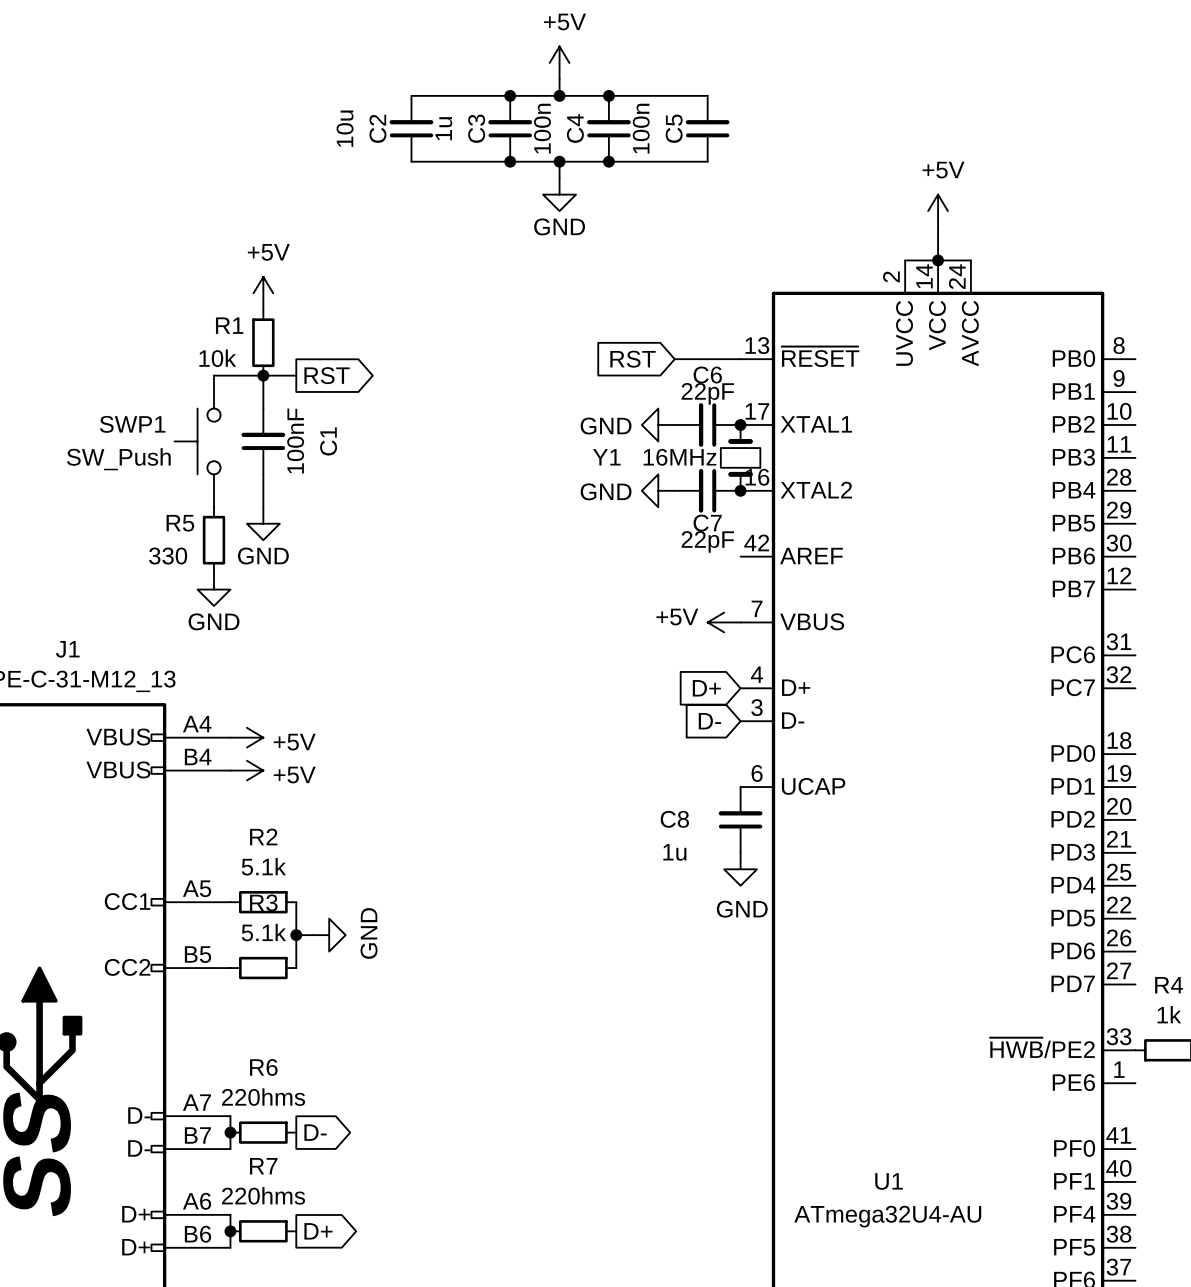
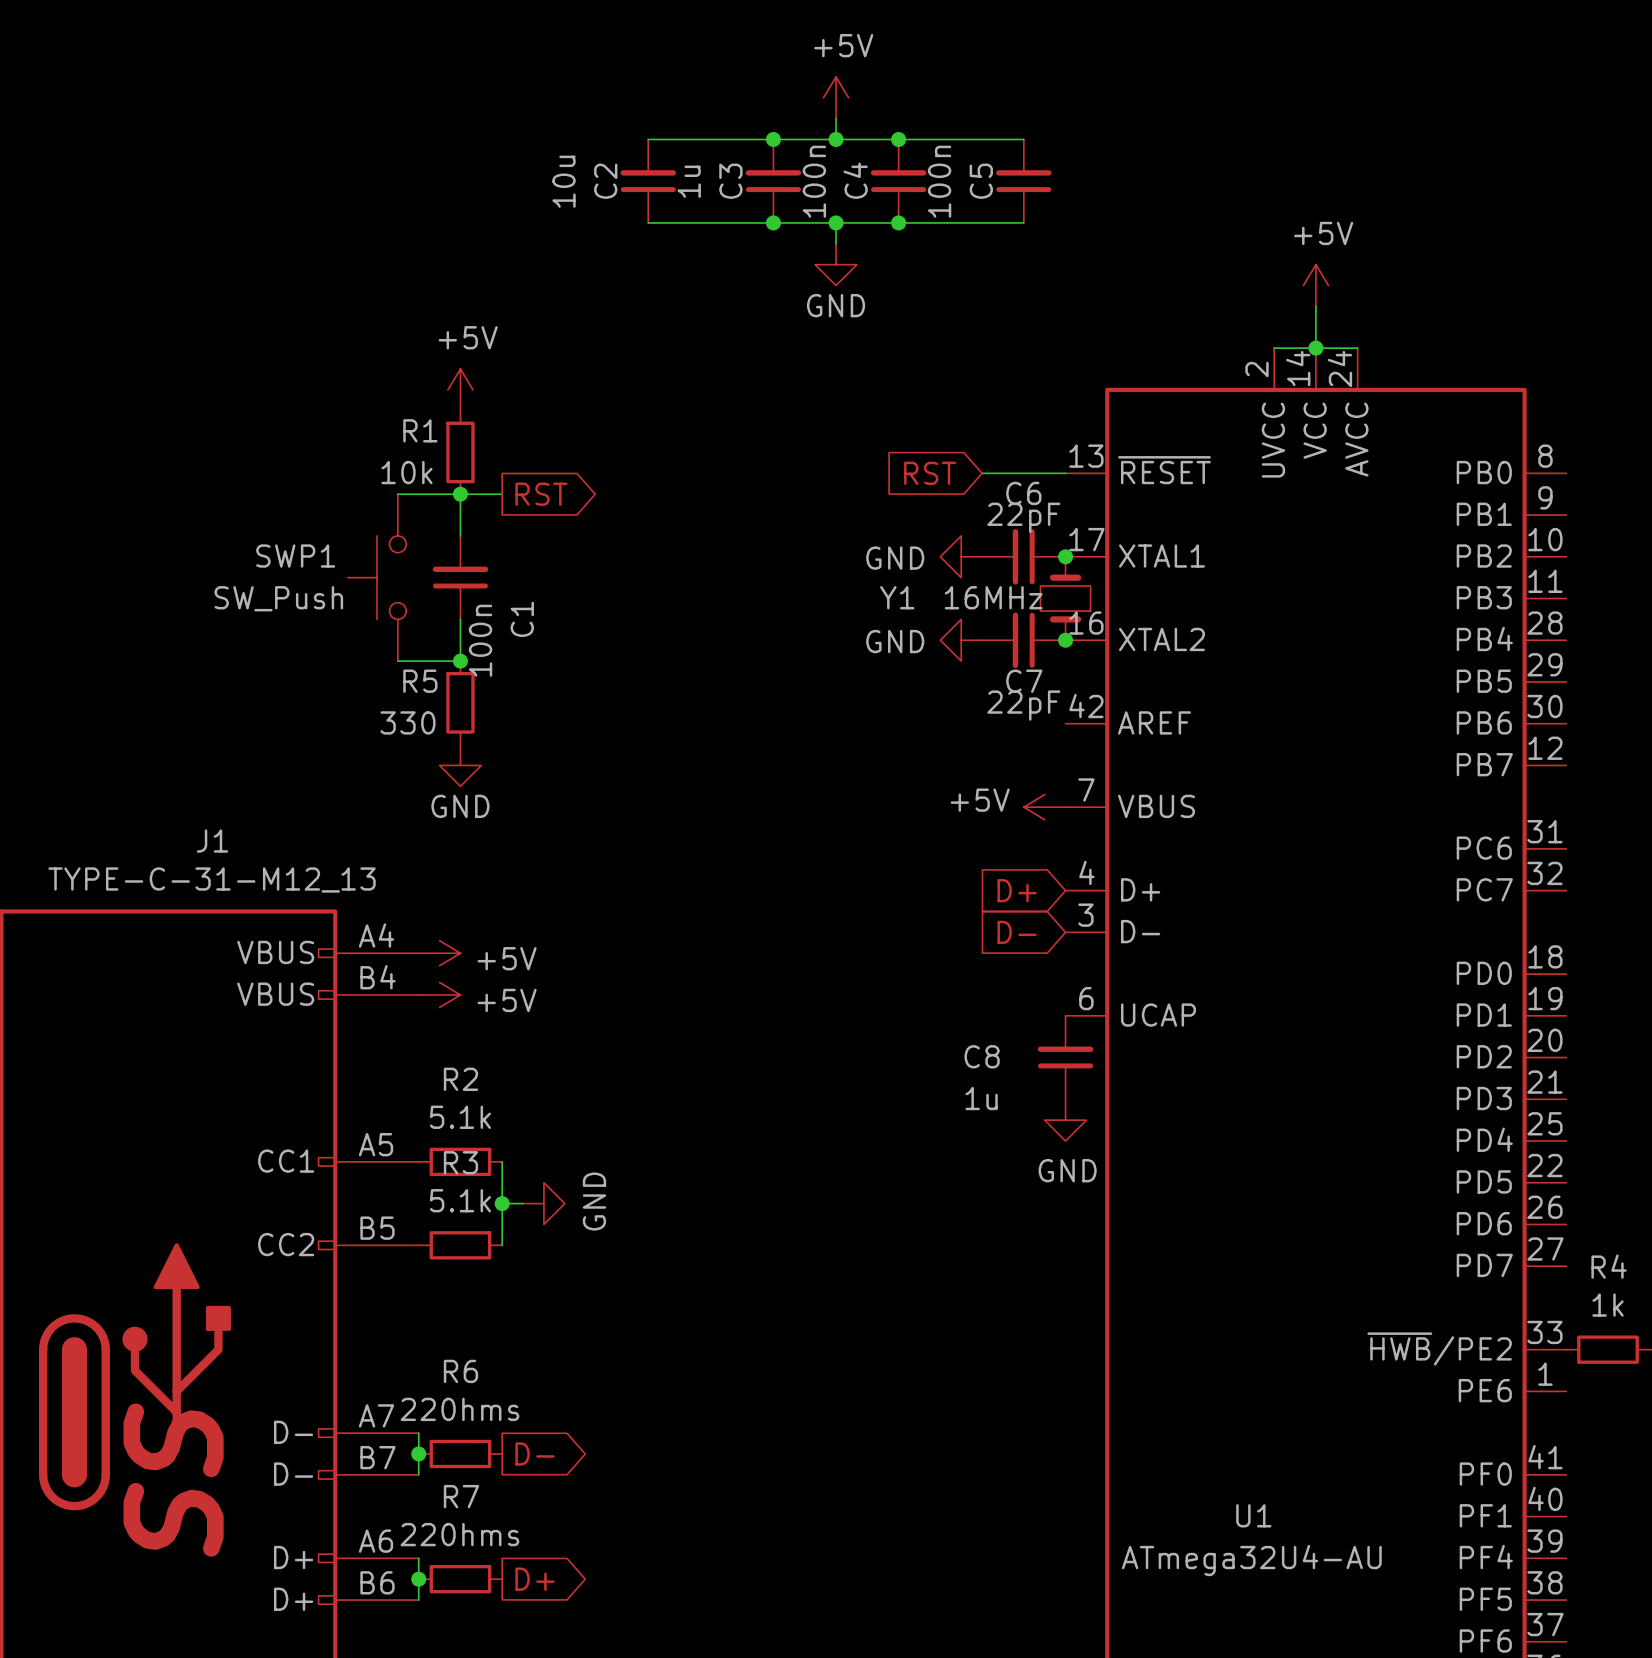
C1 value: 100nF (295, 441) -> 100n (480, 640)
C1 name position: C1 (328, 441) -> C1 (522, 619)
wire: none -> (397, 661) (460, 661)
junction: none -> (460, 661)
power symbol: GND (263, 523) -> none
R5 position: (214, 540) -> (460, 702)
power symbol: GND (214, 589) -> none
power symbol: none -> GND (460, 765)

